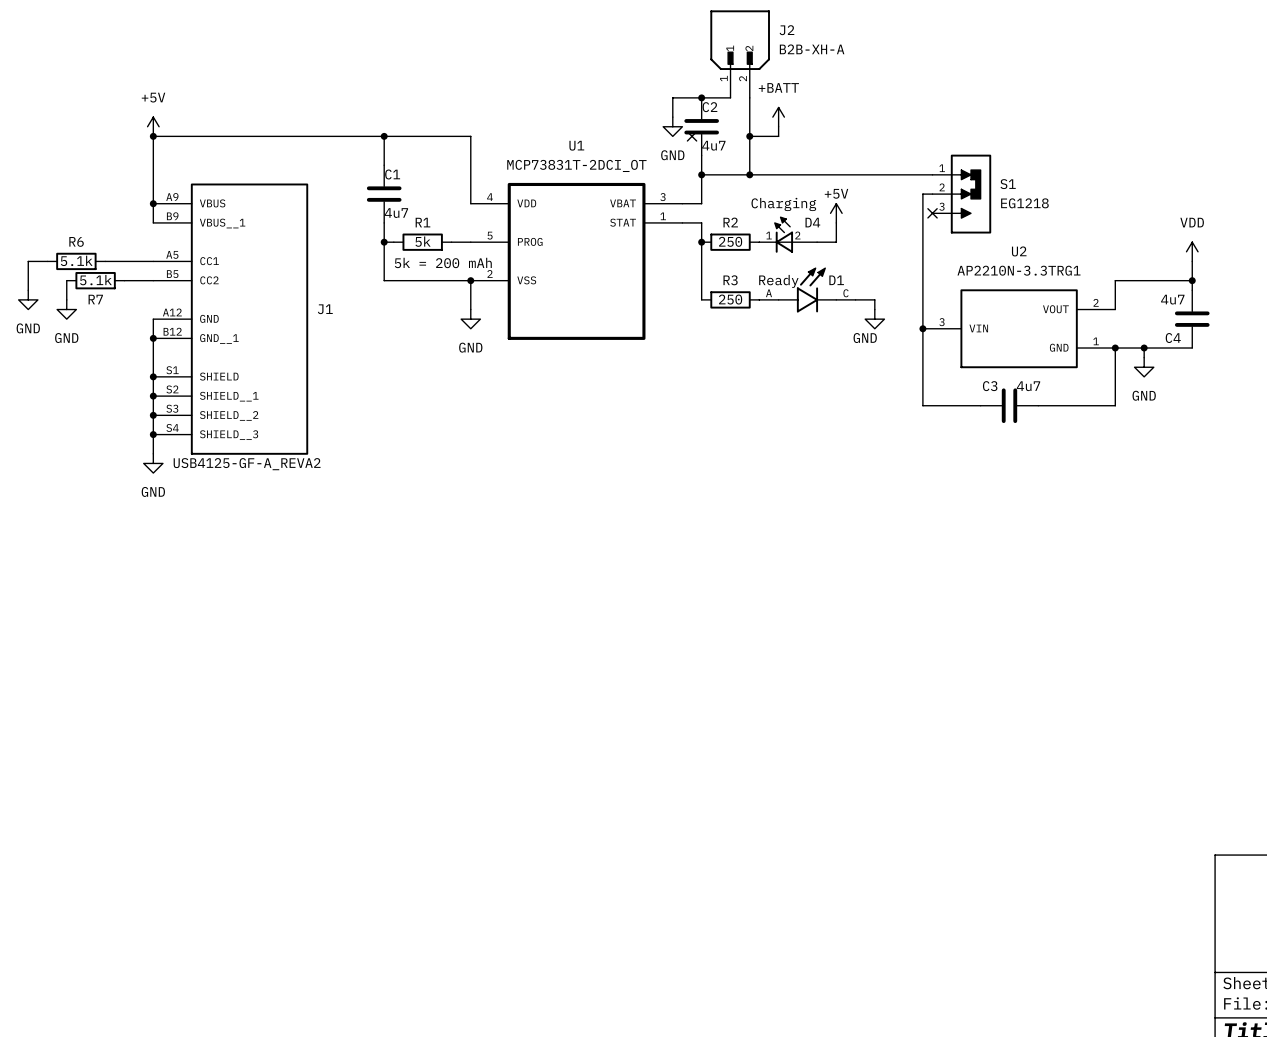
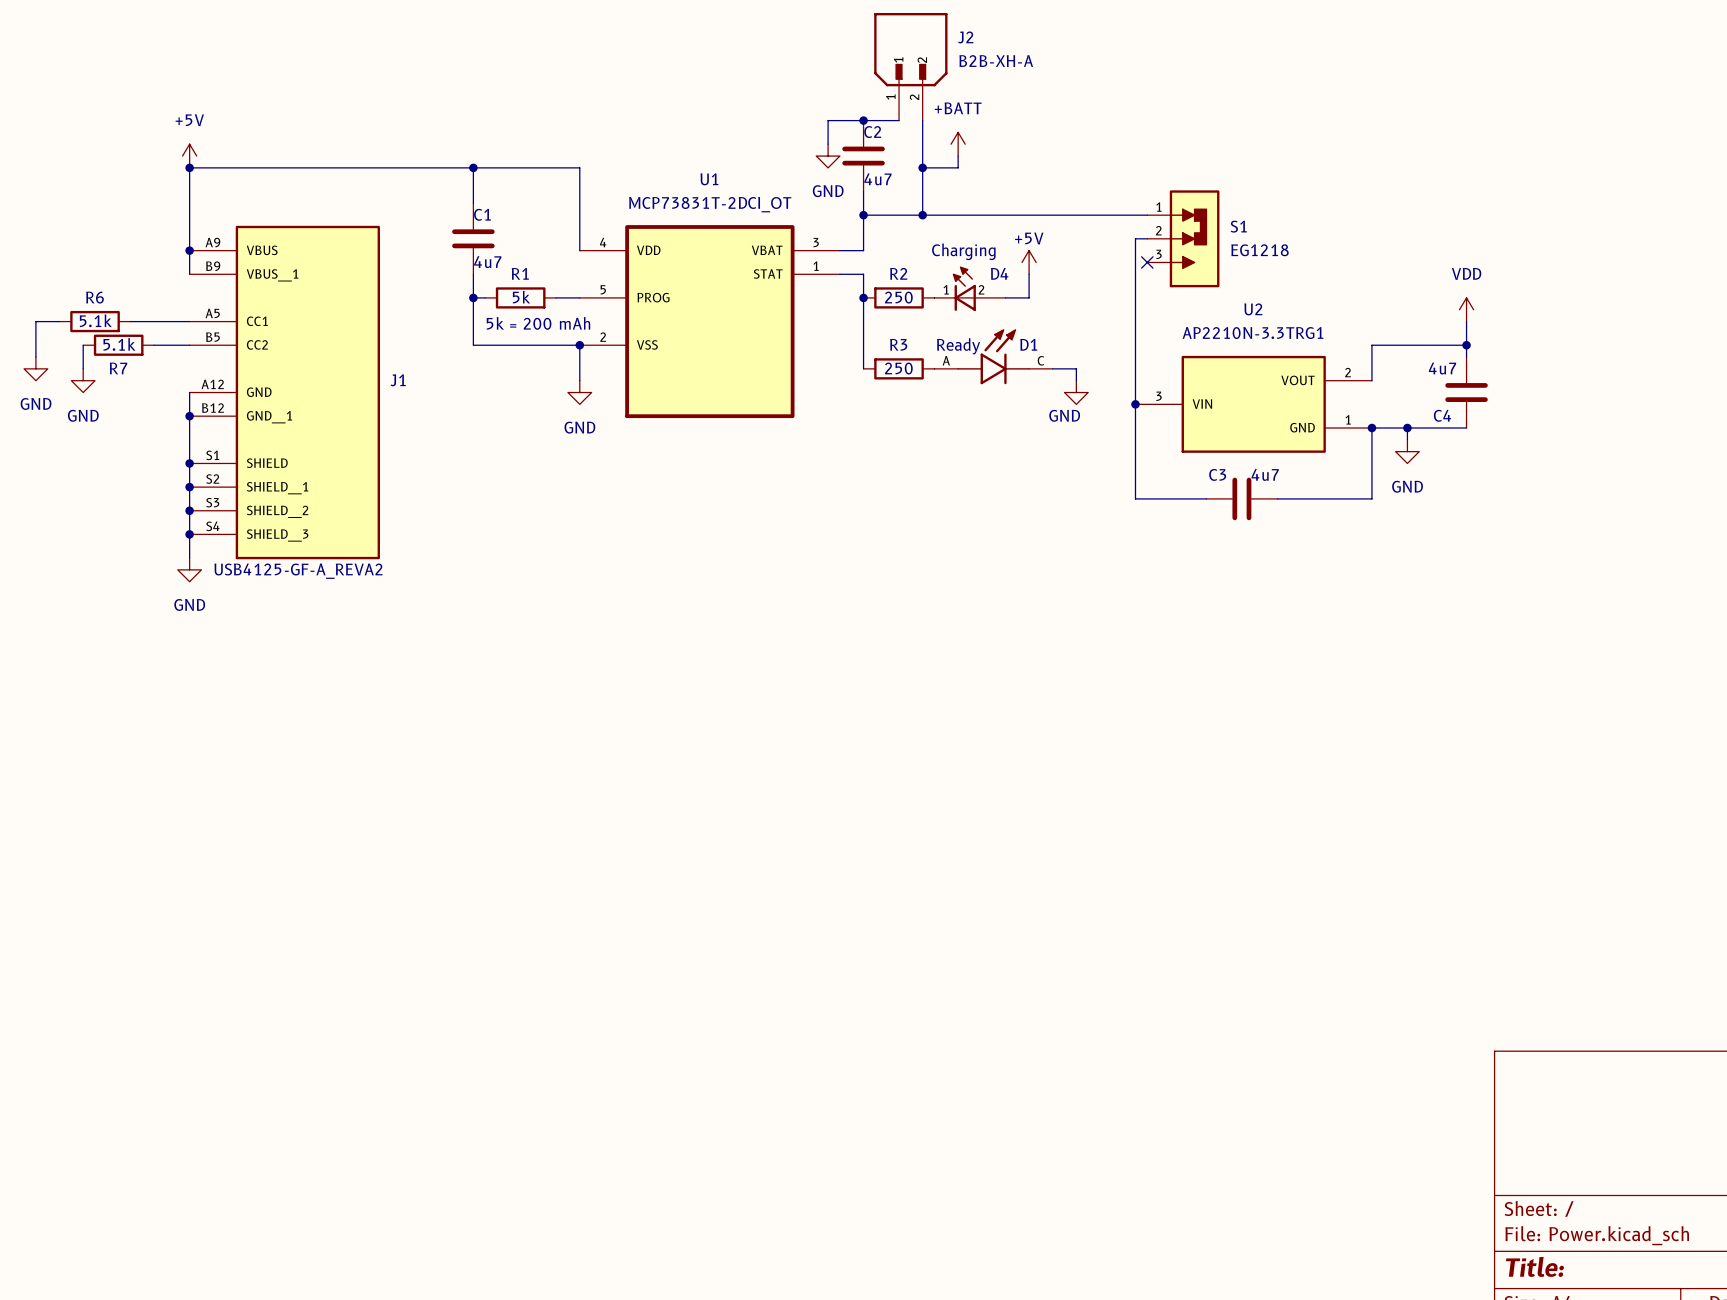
no-connect mark: (692, 136) -> none

